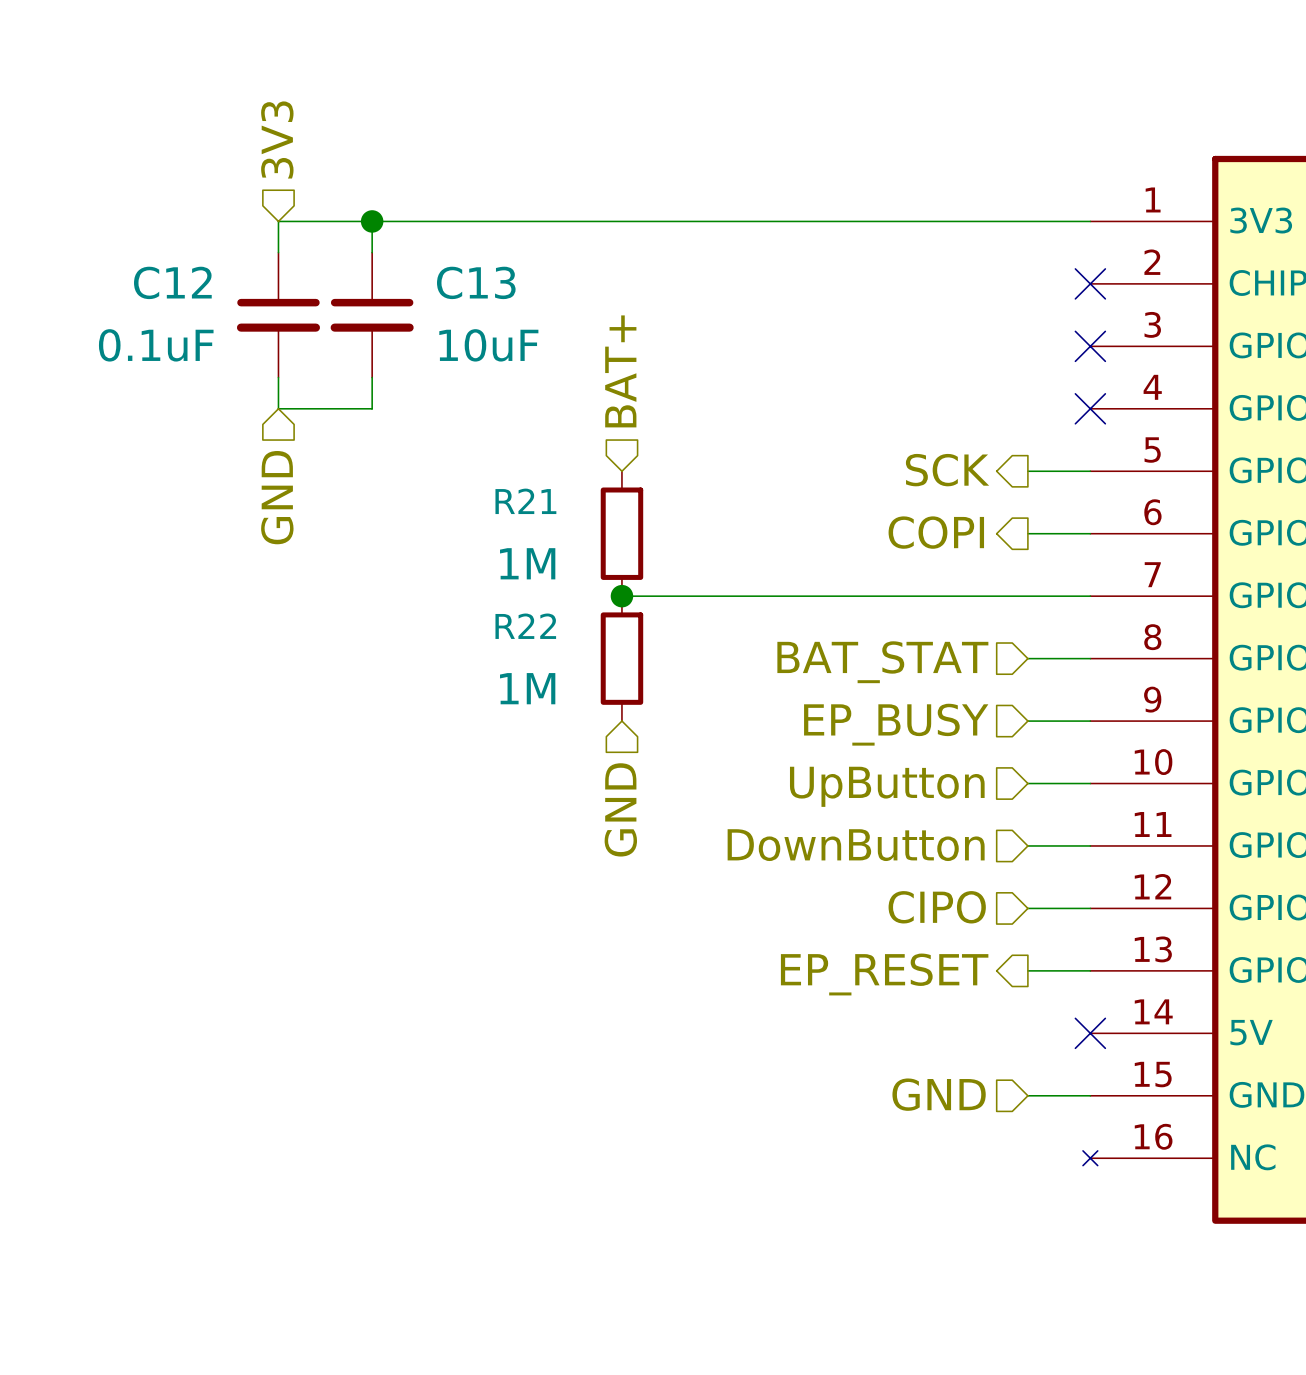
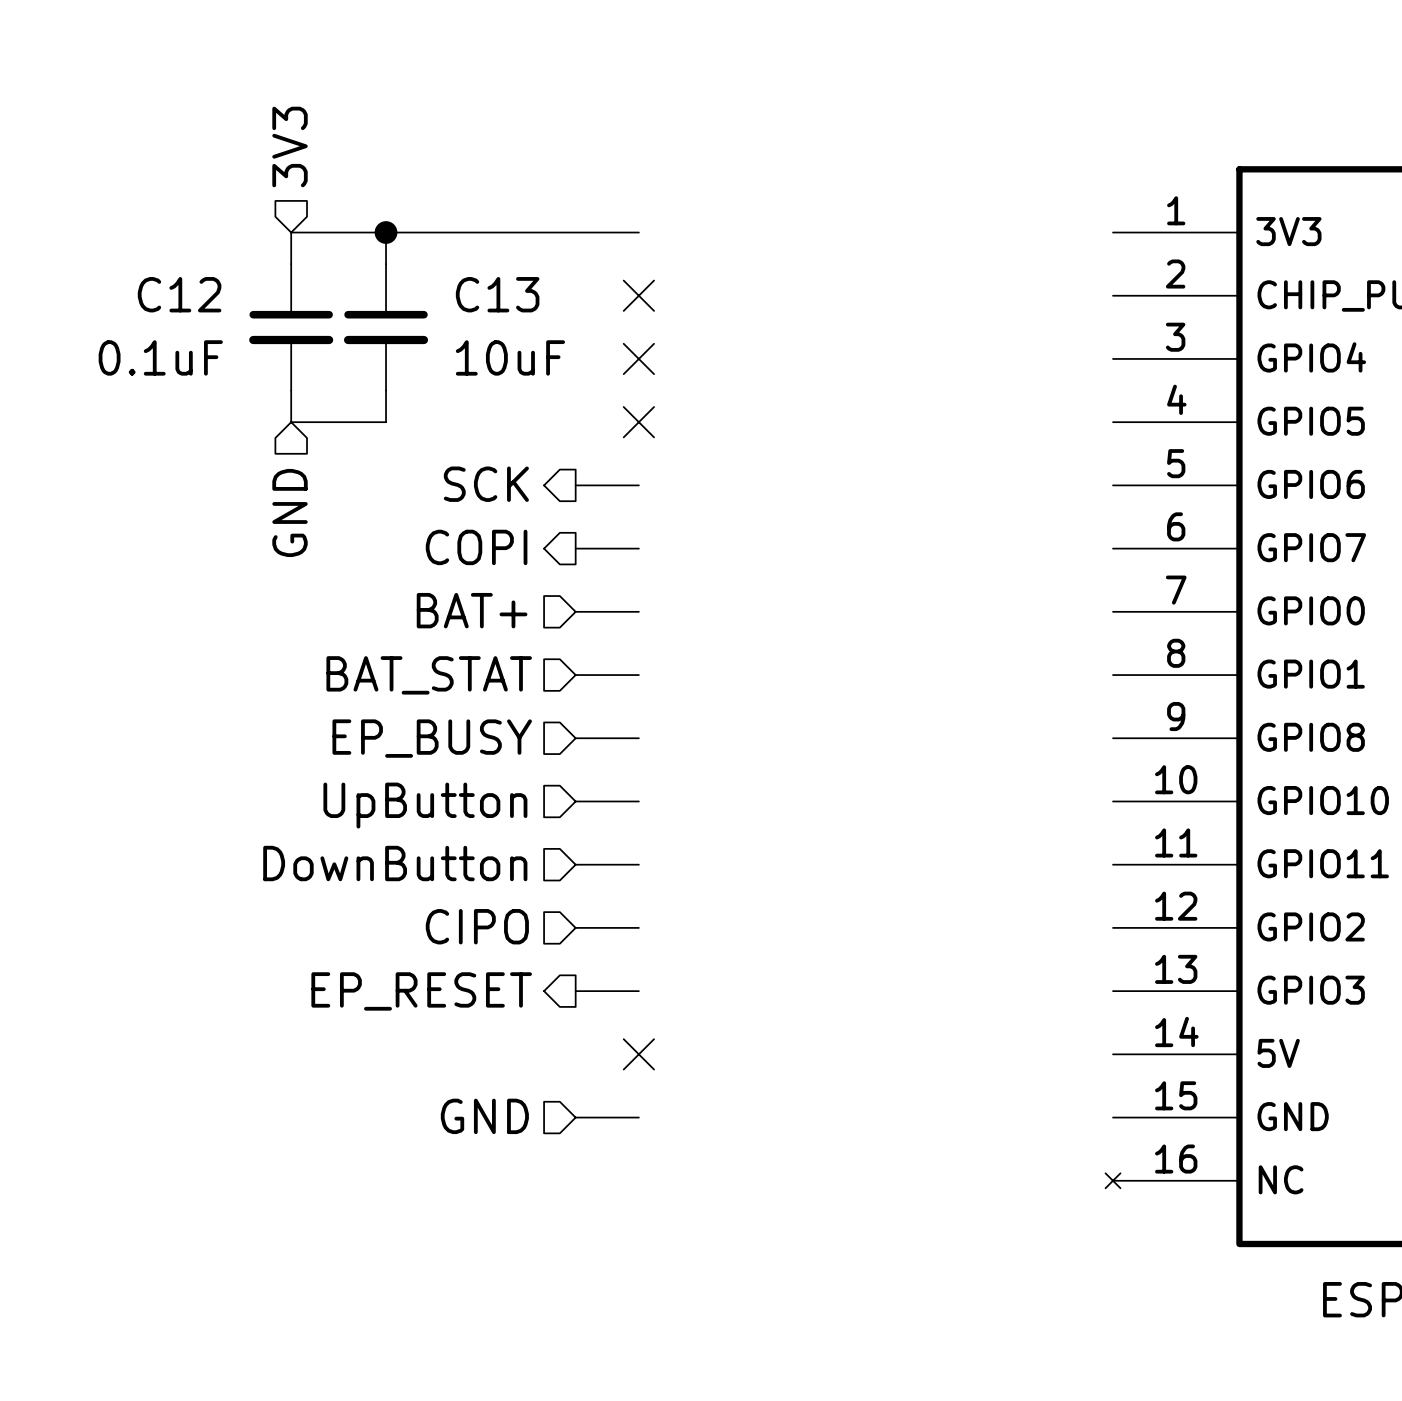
wire: (621, 221) (1090, 221) -> none
no-connect mark: none -> (638, 295)
no-connect mark: (1090, 283) -> none
no-connect mark: none -> (638, 358)
no-connect mark: (1090, 346) -> none
hierarchical label rotation: 0° (620, 371) -> 90° counterclockwise (472, 610)
hierarchical label position: BAT+ (620, 371) -> BAT+ (472, 610)
no-connect mark: none -> (638, 422)
no-connect mark: (1090, 408) -> none
hierarchical label position: SCK (947, 470) -> SCK (486, 484)
wire: (1027, 471) (1090, 471) -> (575, 485) (638, 485)
hierarchical label position: COPI (936, 532) -> COPI (476, 547)
R21: 1M (621, 533) -> none
wire: (1027, 533) (1090, 533) -> (575, 548) (638, 548)
wire: (621, 596) (1090, 596) -> (638, 611) (575, 611)
junction: (621, 596) -> none
R22: 1M (621, 658) -> none
wire: (1027, 658) (1090, 658) -> (575, 675) (638, 675)
hierarchical label position: BAT_STAT (882, 662) -> BAT_STAT (429, 675)
wire: (1027, 721) (1090, 721) -> (575, 738) (638, 738)
hierarchical label position: EP_BUSY (896, 724) -> EP_BUSY (432, 738)
wire: (1027, 783) (1090, 783) -> (575, 801) (638, 801)
hierarchical label position: UpButton (887, 786) -> UpButton (425, 805)
hierarchical label: GND (620, 809) -> none
hierarchical label position: DownButton (856, 845) -> DownButton (395, 863)
wire: (1027, 845) (1090, 845) -> (575, 864) (638, 864)
hierarchical label position: CIPO (937, 907) -> CIPO (477, 926)
wire: (1027, 908) (1090, 908) -> (575, 927) (638, 927)
wire: (1027, 970) (1090, 970) -> (575, 991) (638, 991)
hierarchical label position: EP_RESET (884, 974) -> EP_RESET (421, 991)
no-connect mark: none -> (638, 1054)
no-connect mark: (1090, 1033) -> none
hierarchical label: none -> GND (484, 1116)
hierarchical label: GND (939, 1094) -> none
wire: (1027, 1095) (1090, 1095) -> (575, 1117) (638, 1117)

